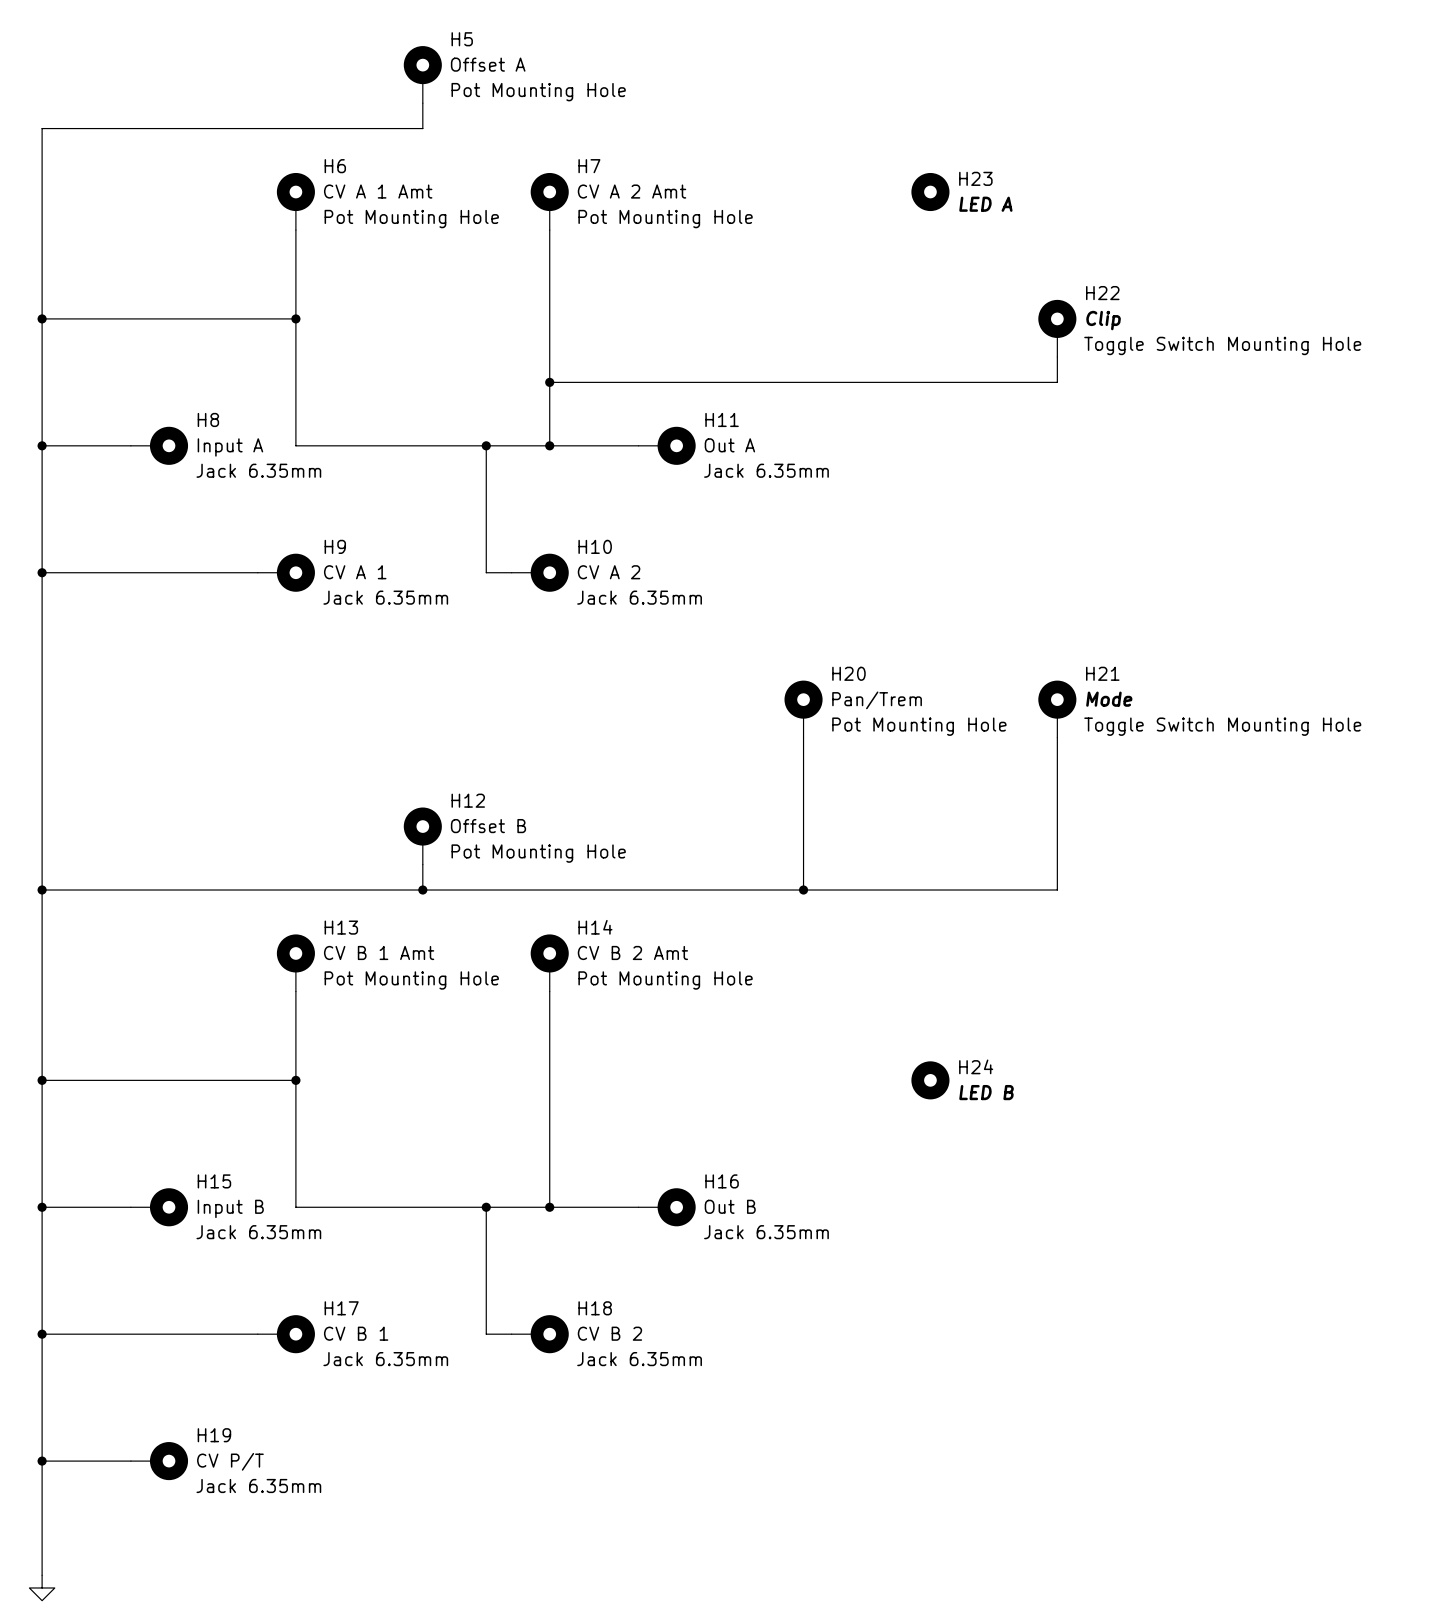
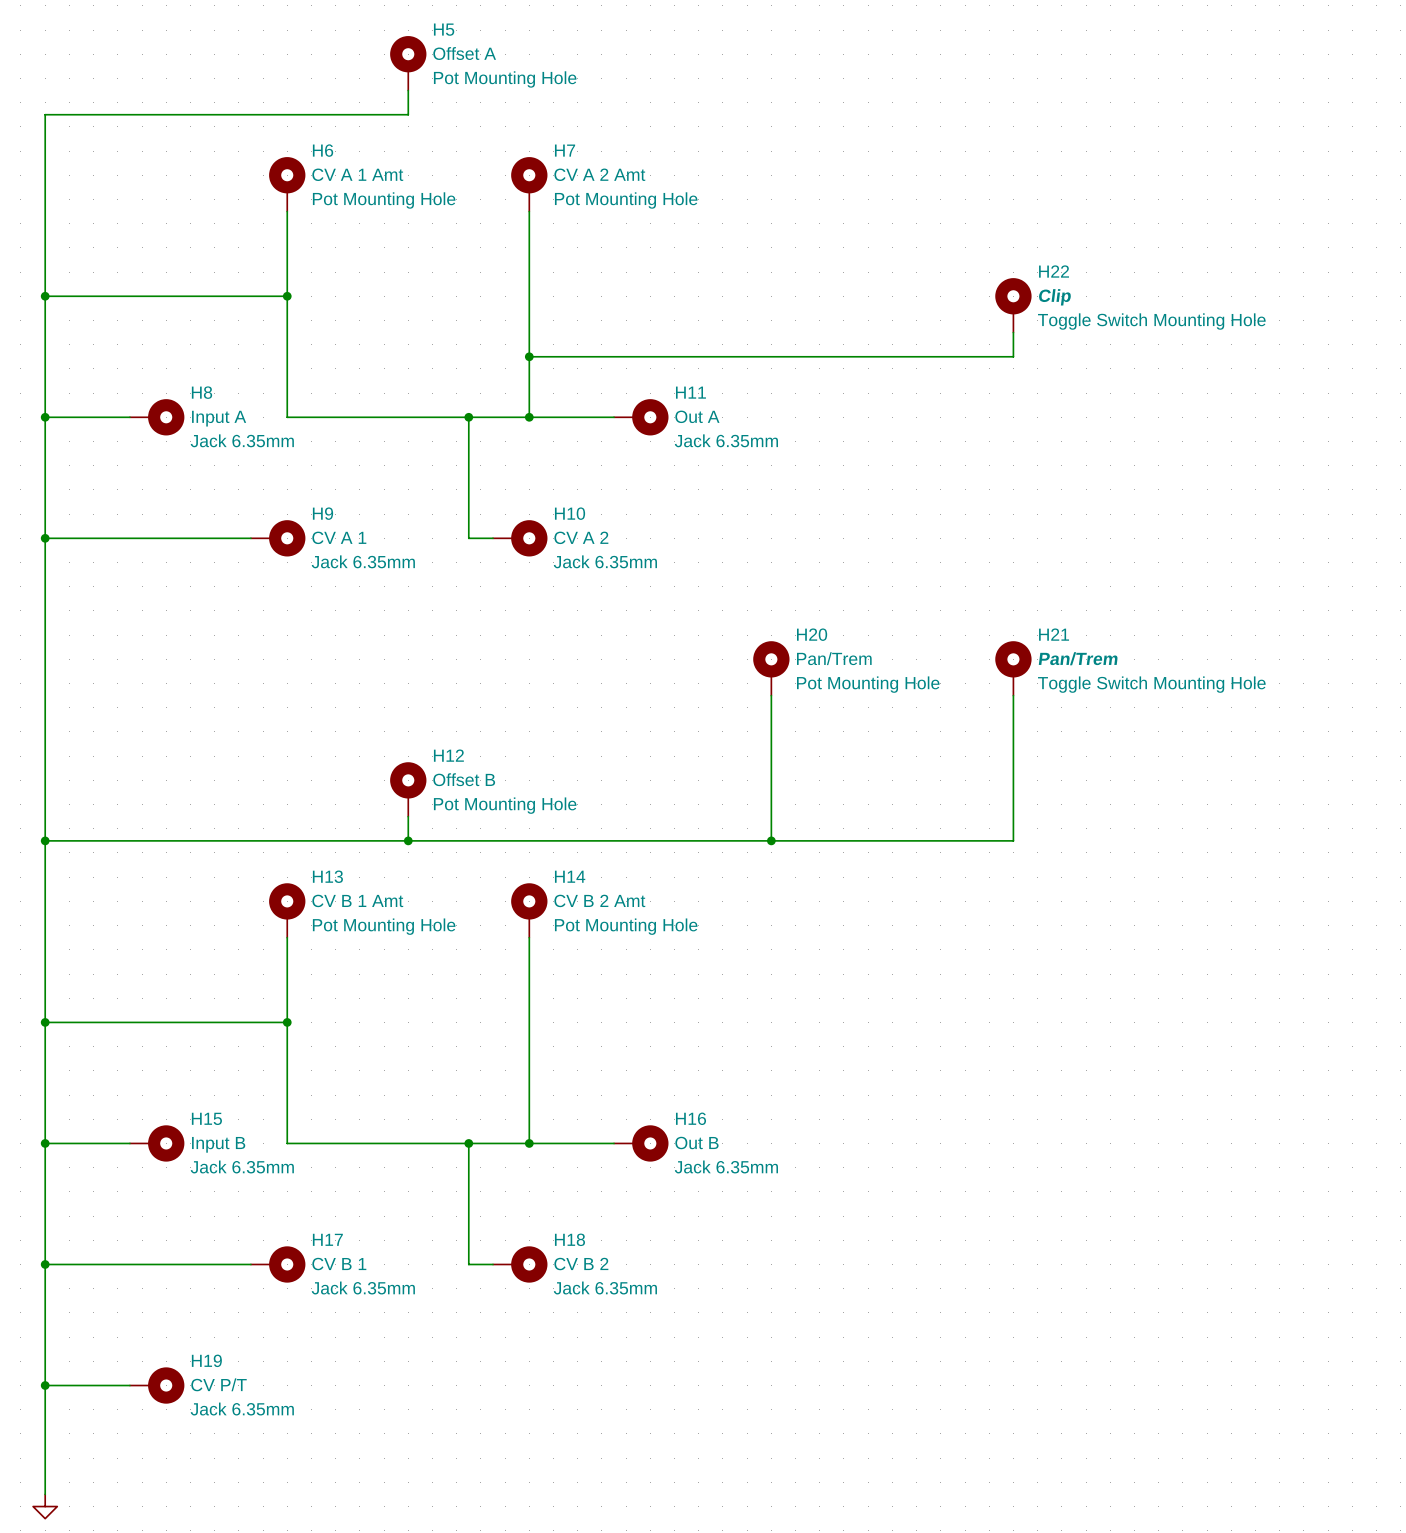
H23: LED A (930, 192) -> none
H21 value: Mode (1109, 699) -> Pan/Trem (1078, 658)
H24: LED B (930, 1080) -> none

